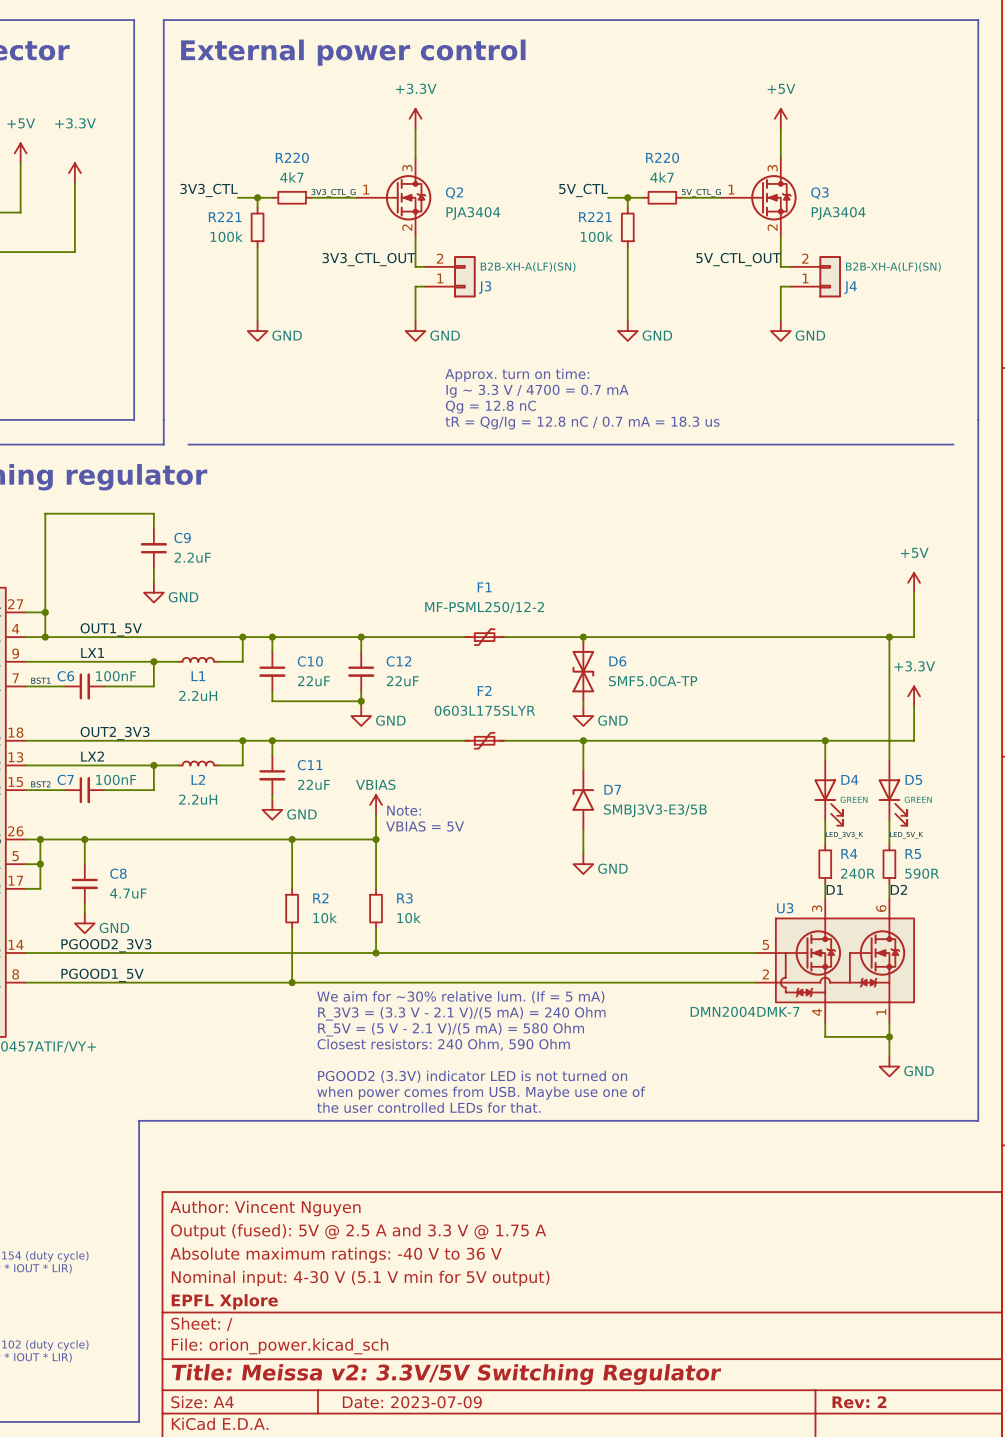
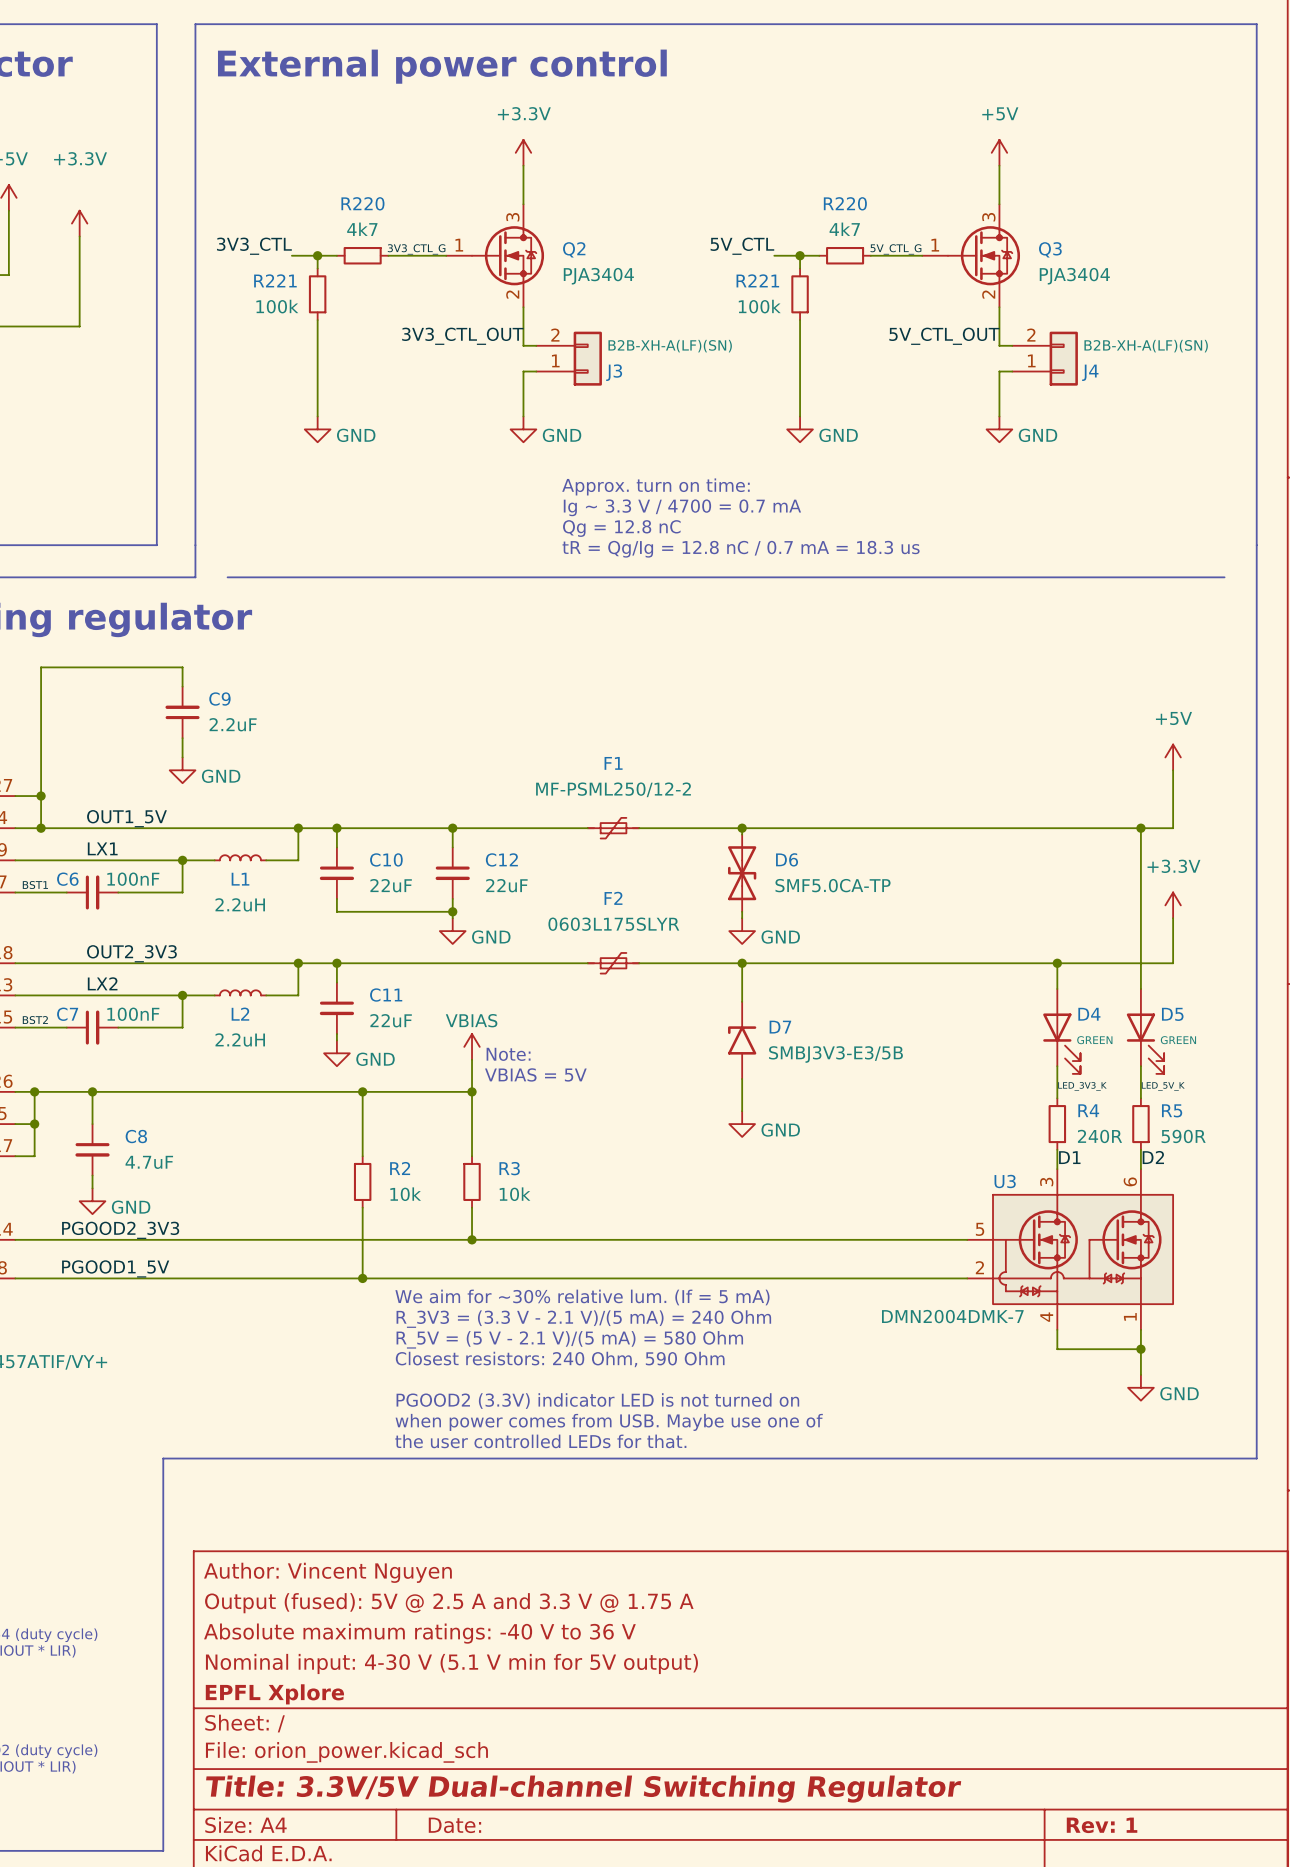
title block: Title: Meissa v2: 3.3V/5V Switching Regulator (446, 1374) -> Title: 3.3V/5V Dual-channel Switching Regulator (583, 1789)
title block: Date: 2023-07-09 (412, 1402) -> Date: (454, 1825)
title block: Rev: 2 (859, 1402) -> Rev: 1 (1102, 1825)

